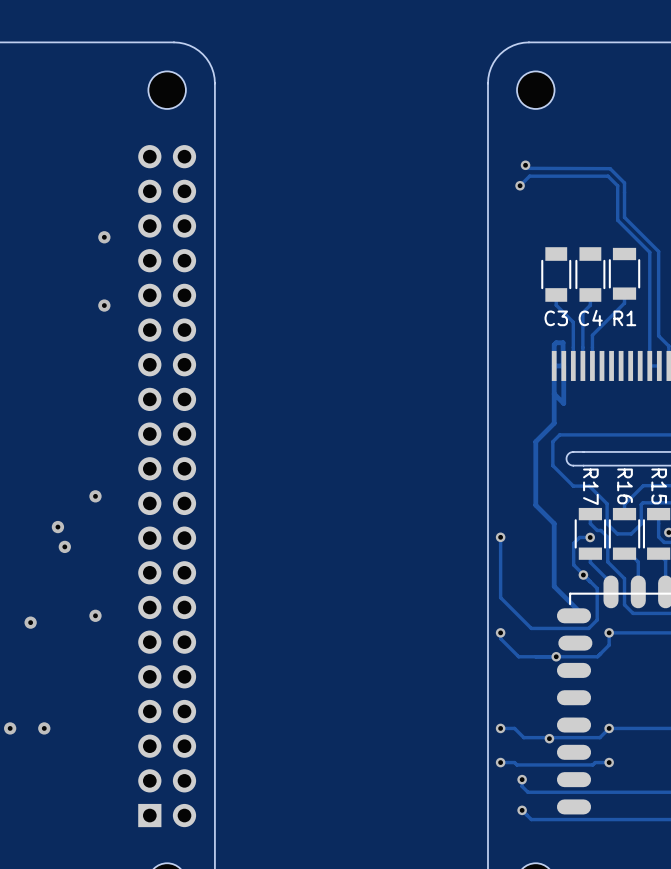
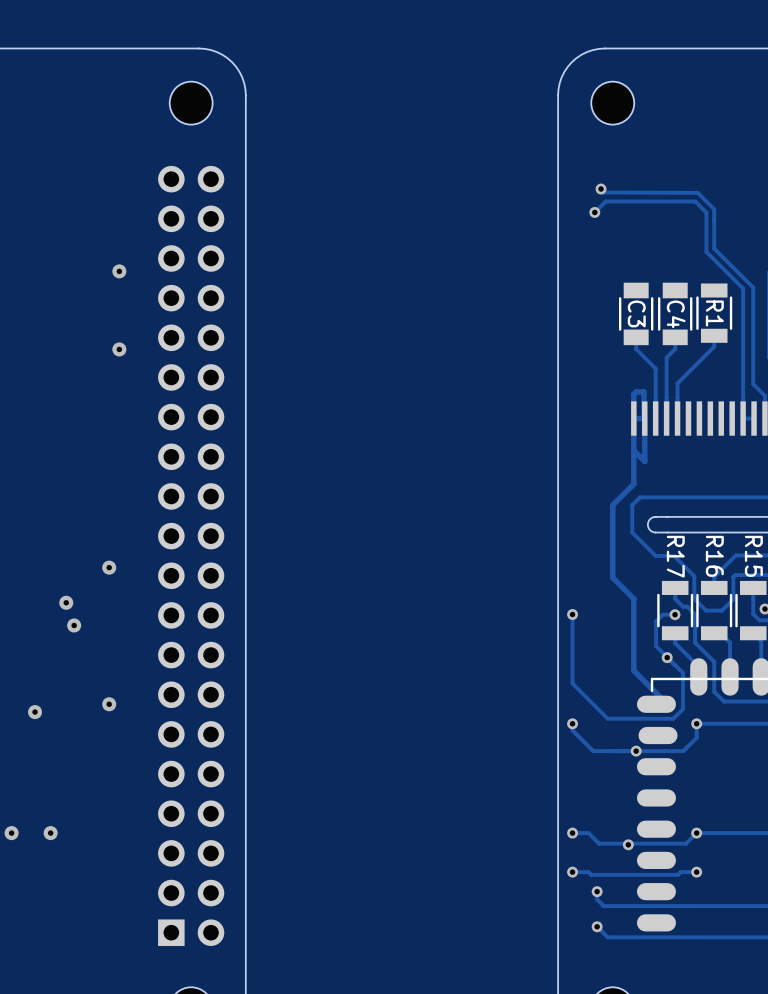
C3 name rotation: 0° (556, 318) -> 90° clockwise (636, 313)
C3 name position: C3 (556, 318) -> C3 (636, 313)
C4 name rotation: 0° (590, 318) -> 90° clockwise (676, 314)
C4 name position: C4 (590, 318) -> C4 (676, 314)
R1 name rotation: 0° (624, 318) -> 90° clockwise (714, 313)
R1 name position: R1 (624, 318) -> R1 (714, 313)

